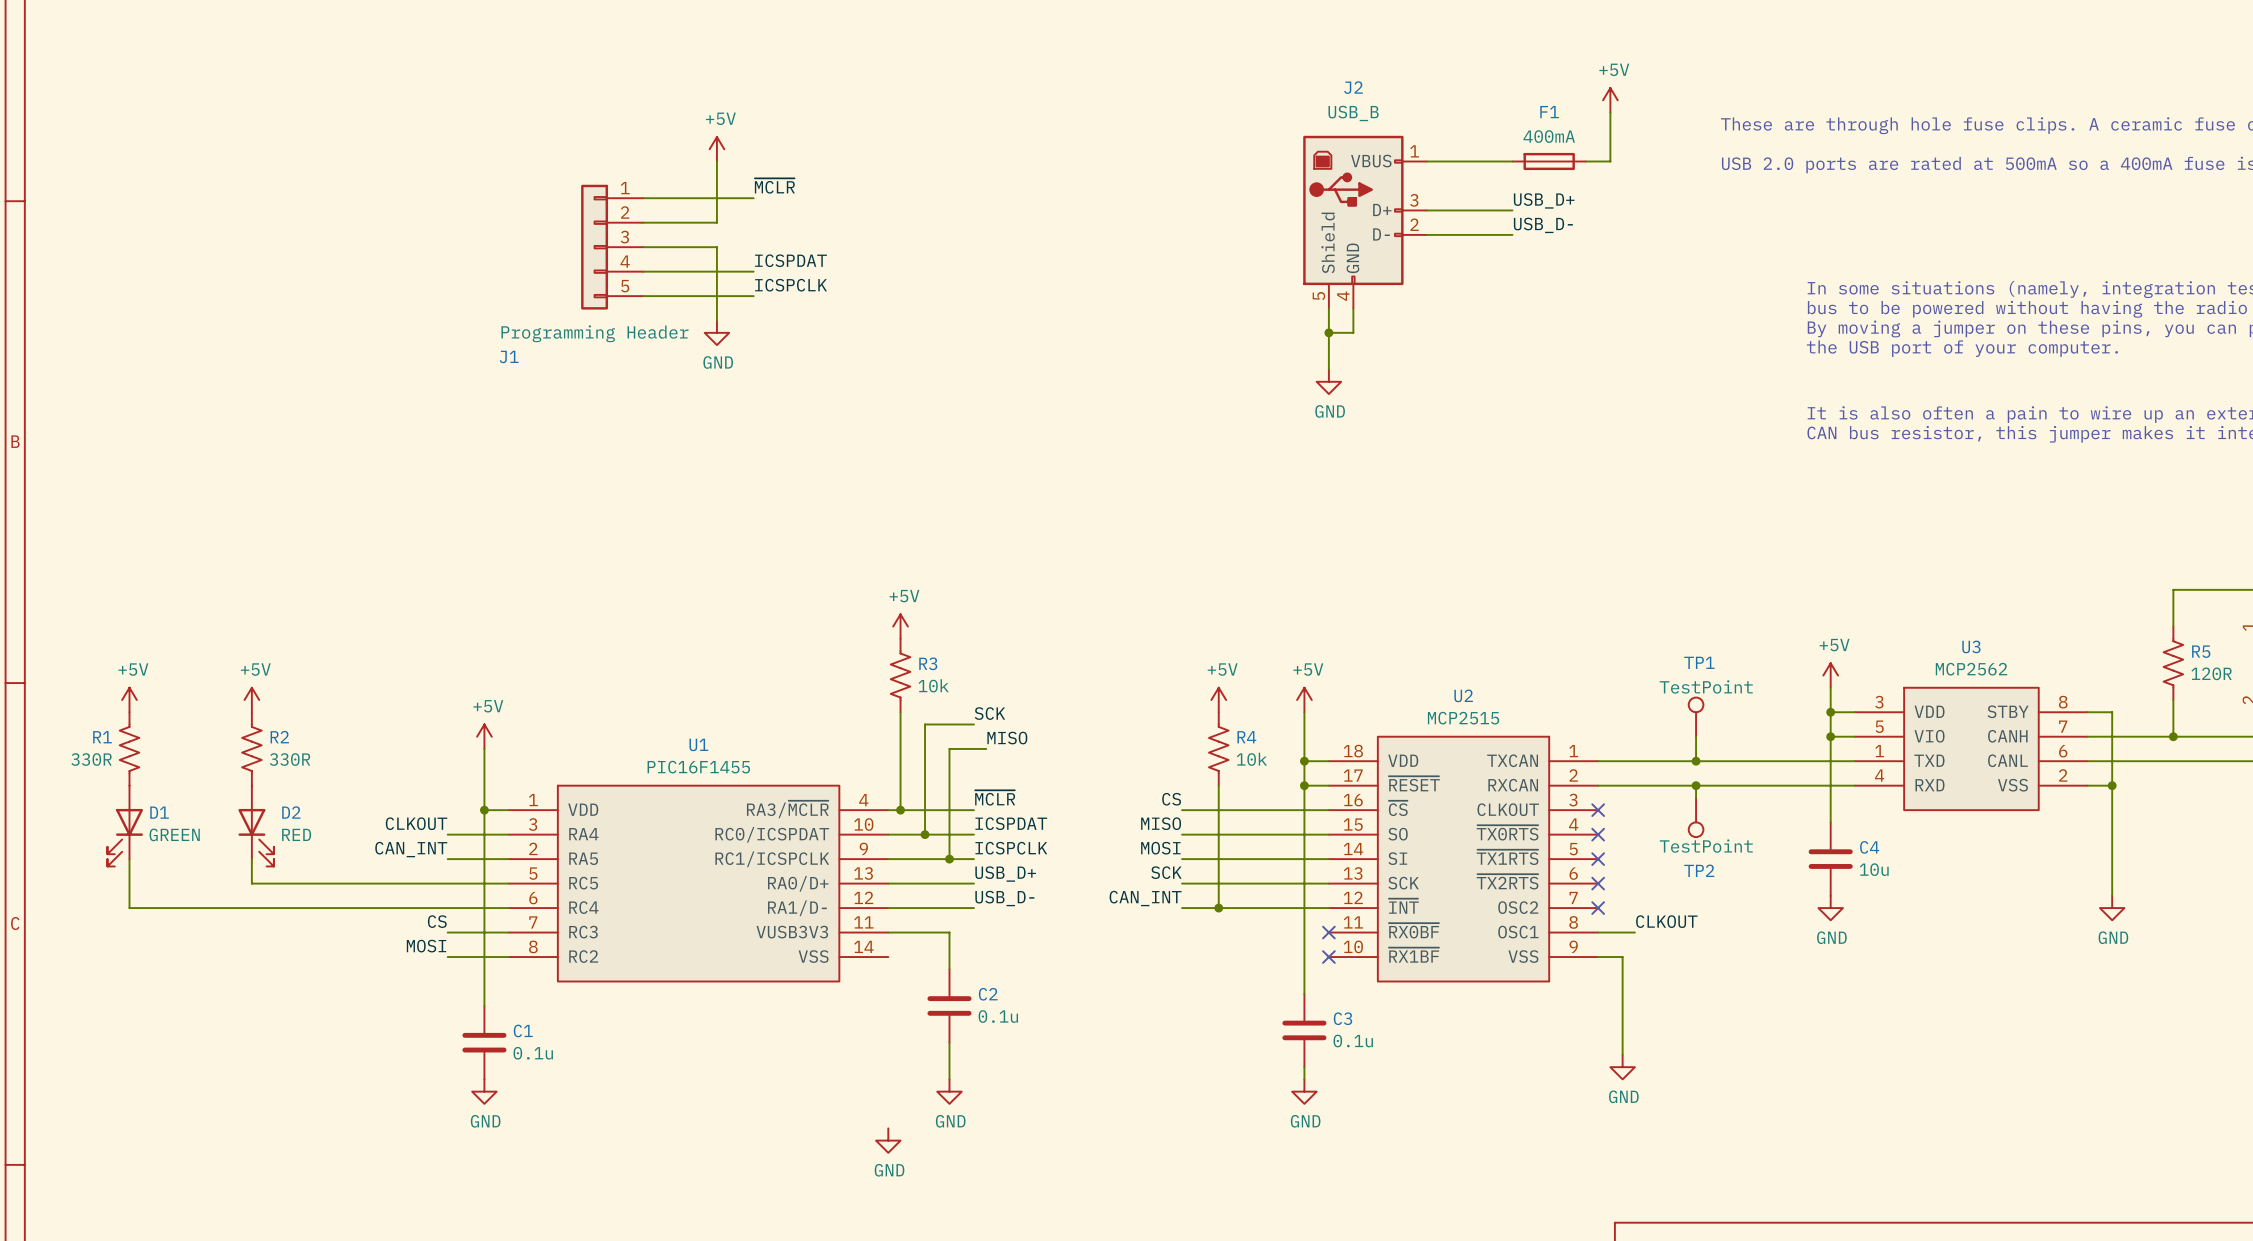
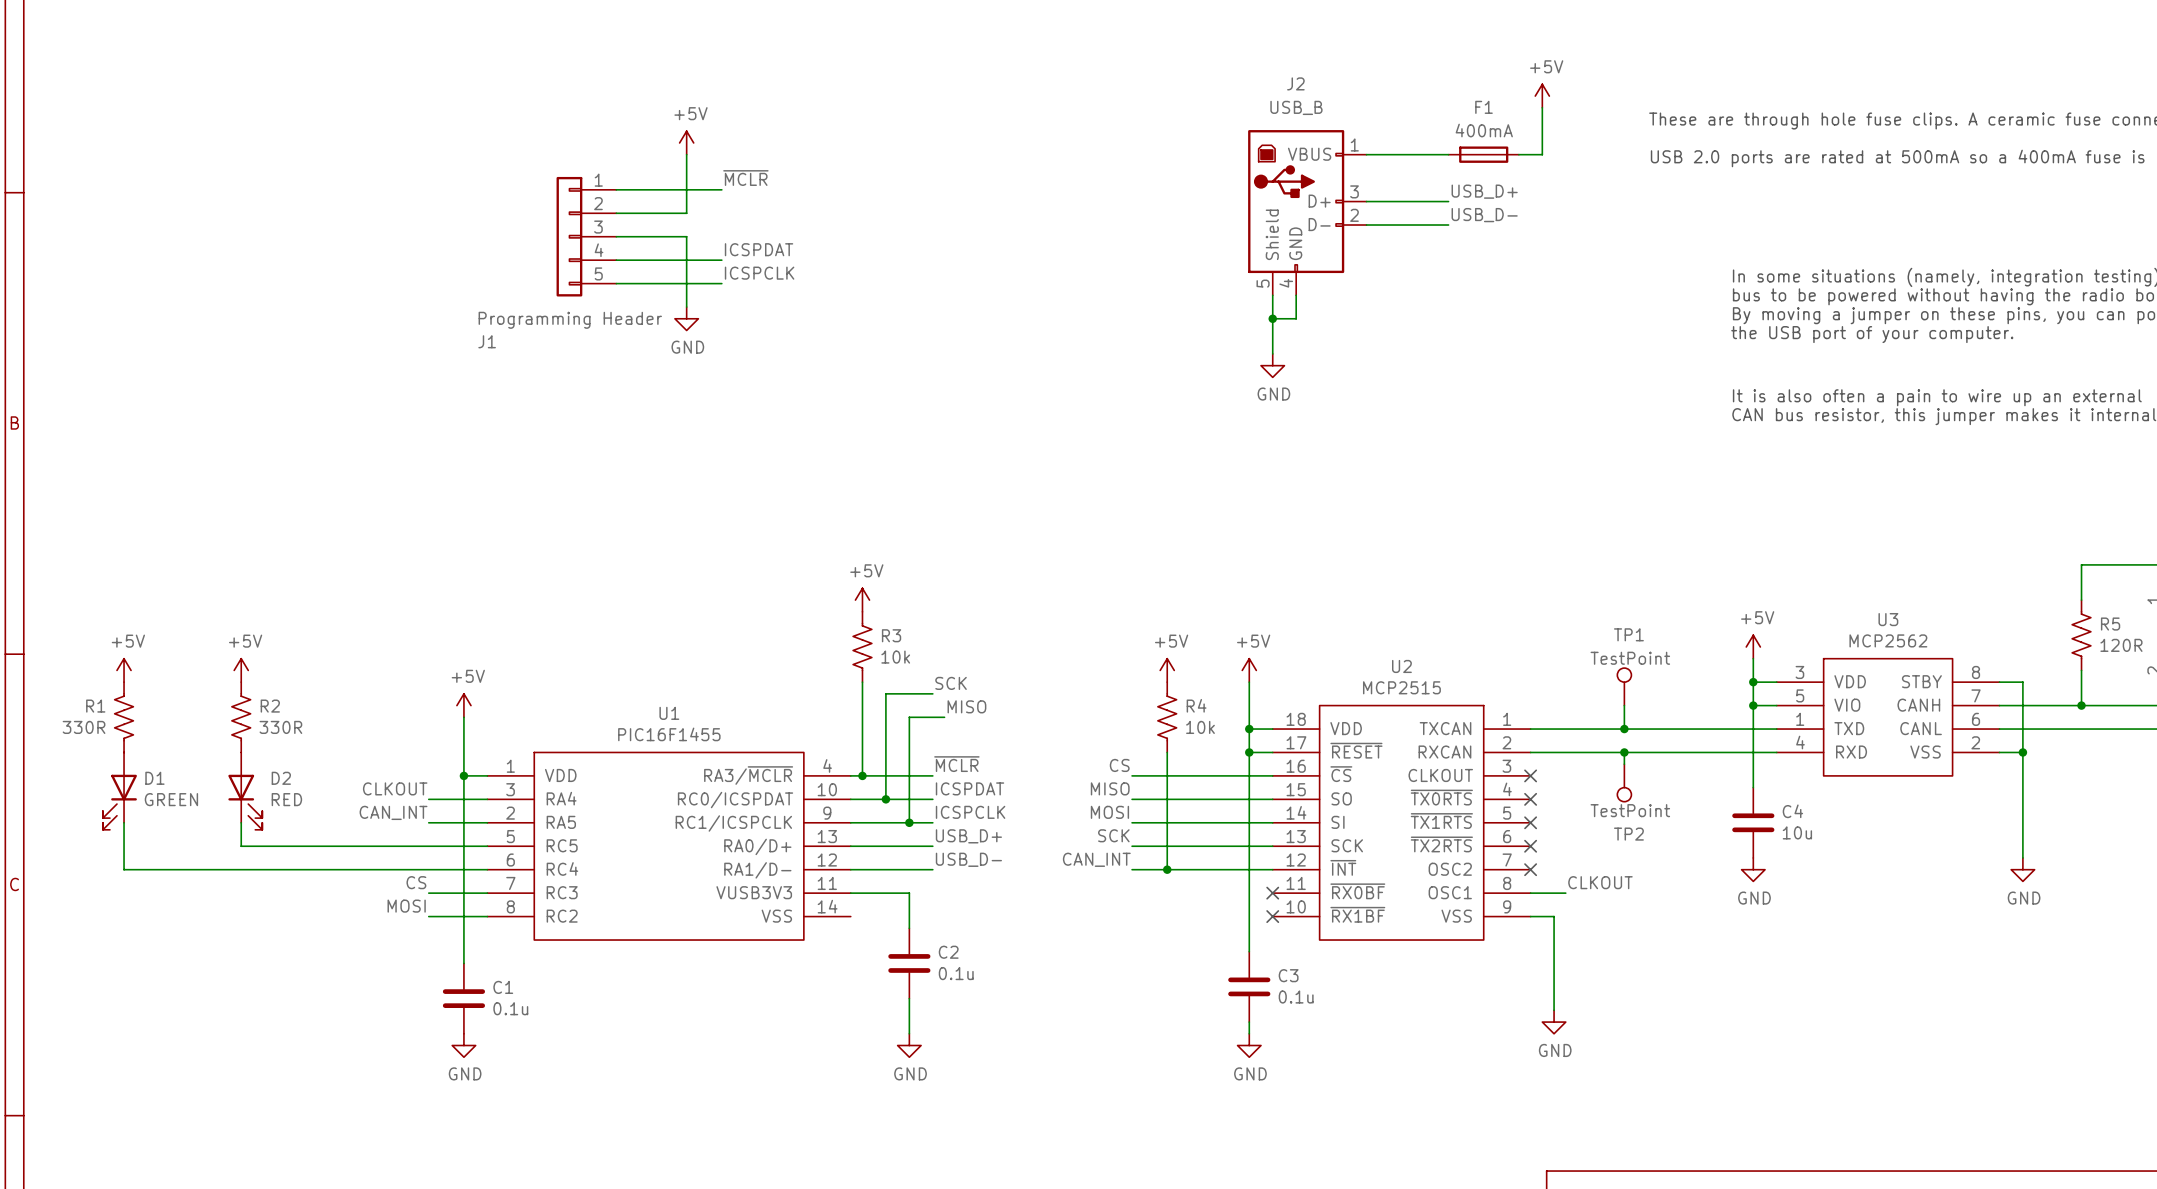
power symbol: GND (888, 1140) -> none

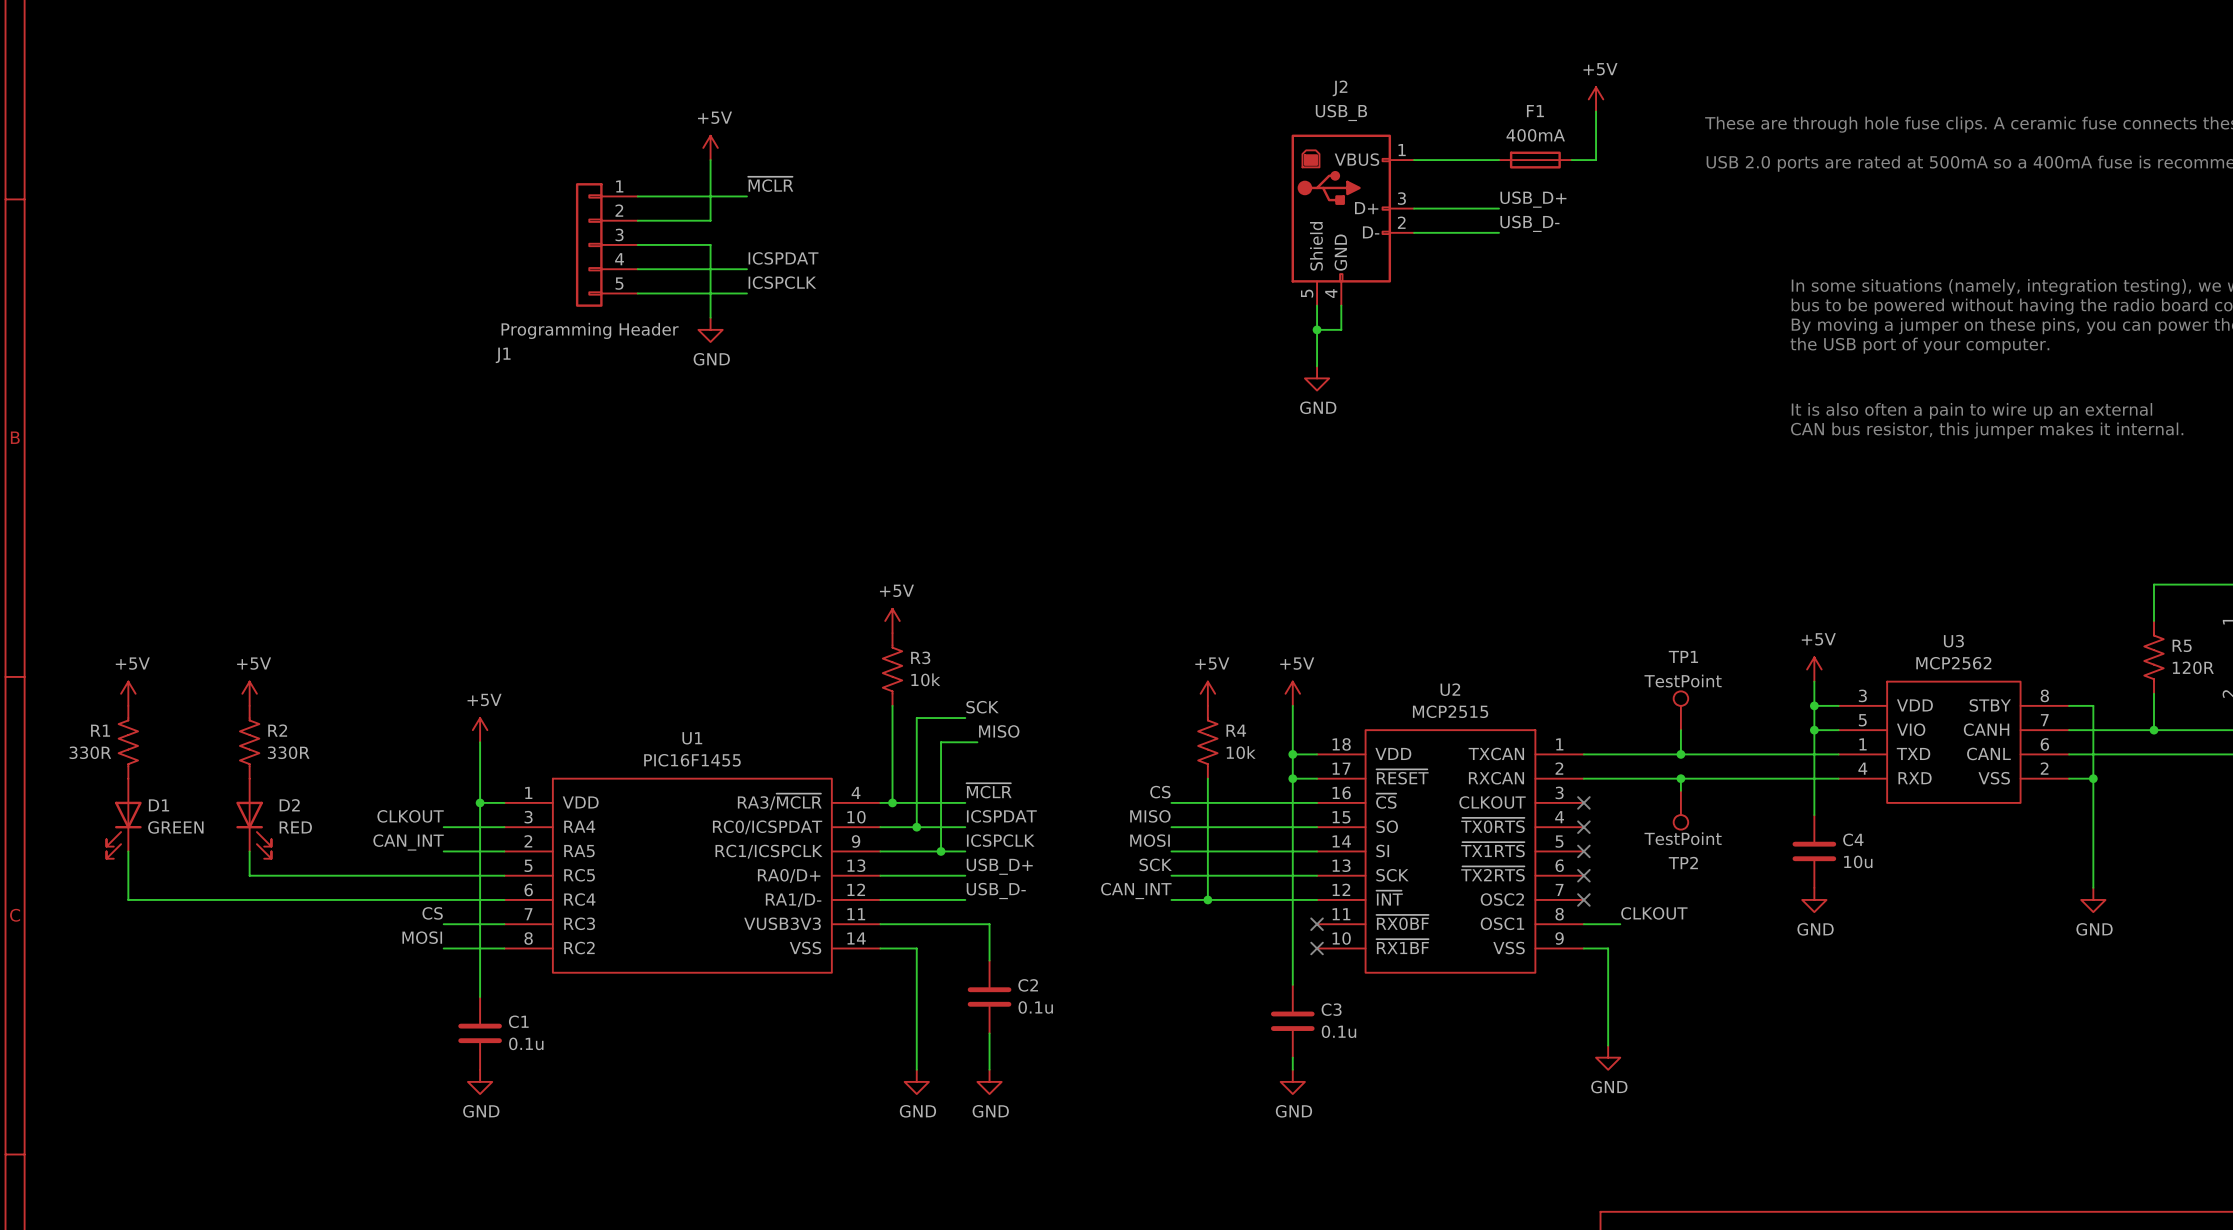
wire: (909, 893) (909, 928) -> (941, 924) (989, 924) (989, 960)
wire: none -> (880, 948) (916, 948) (916, 1069)
C2 position: (909, 963) -> (989, 997)
wire: (909, 998) (909, 1033) -> (989, 1033) (989, 1069)
power symbol: none -> GND (916, 1081)
power symbol: GND (909, 1045) -> none
power symbol: none -> GND (989, 1081)

